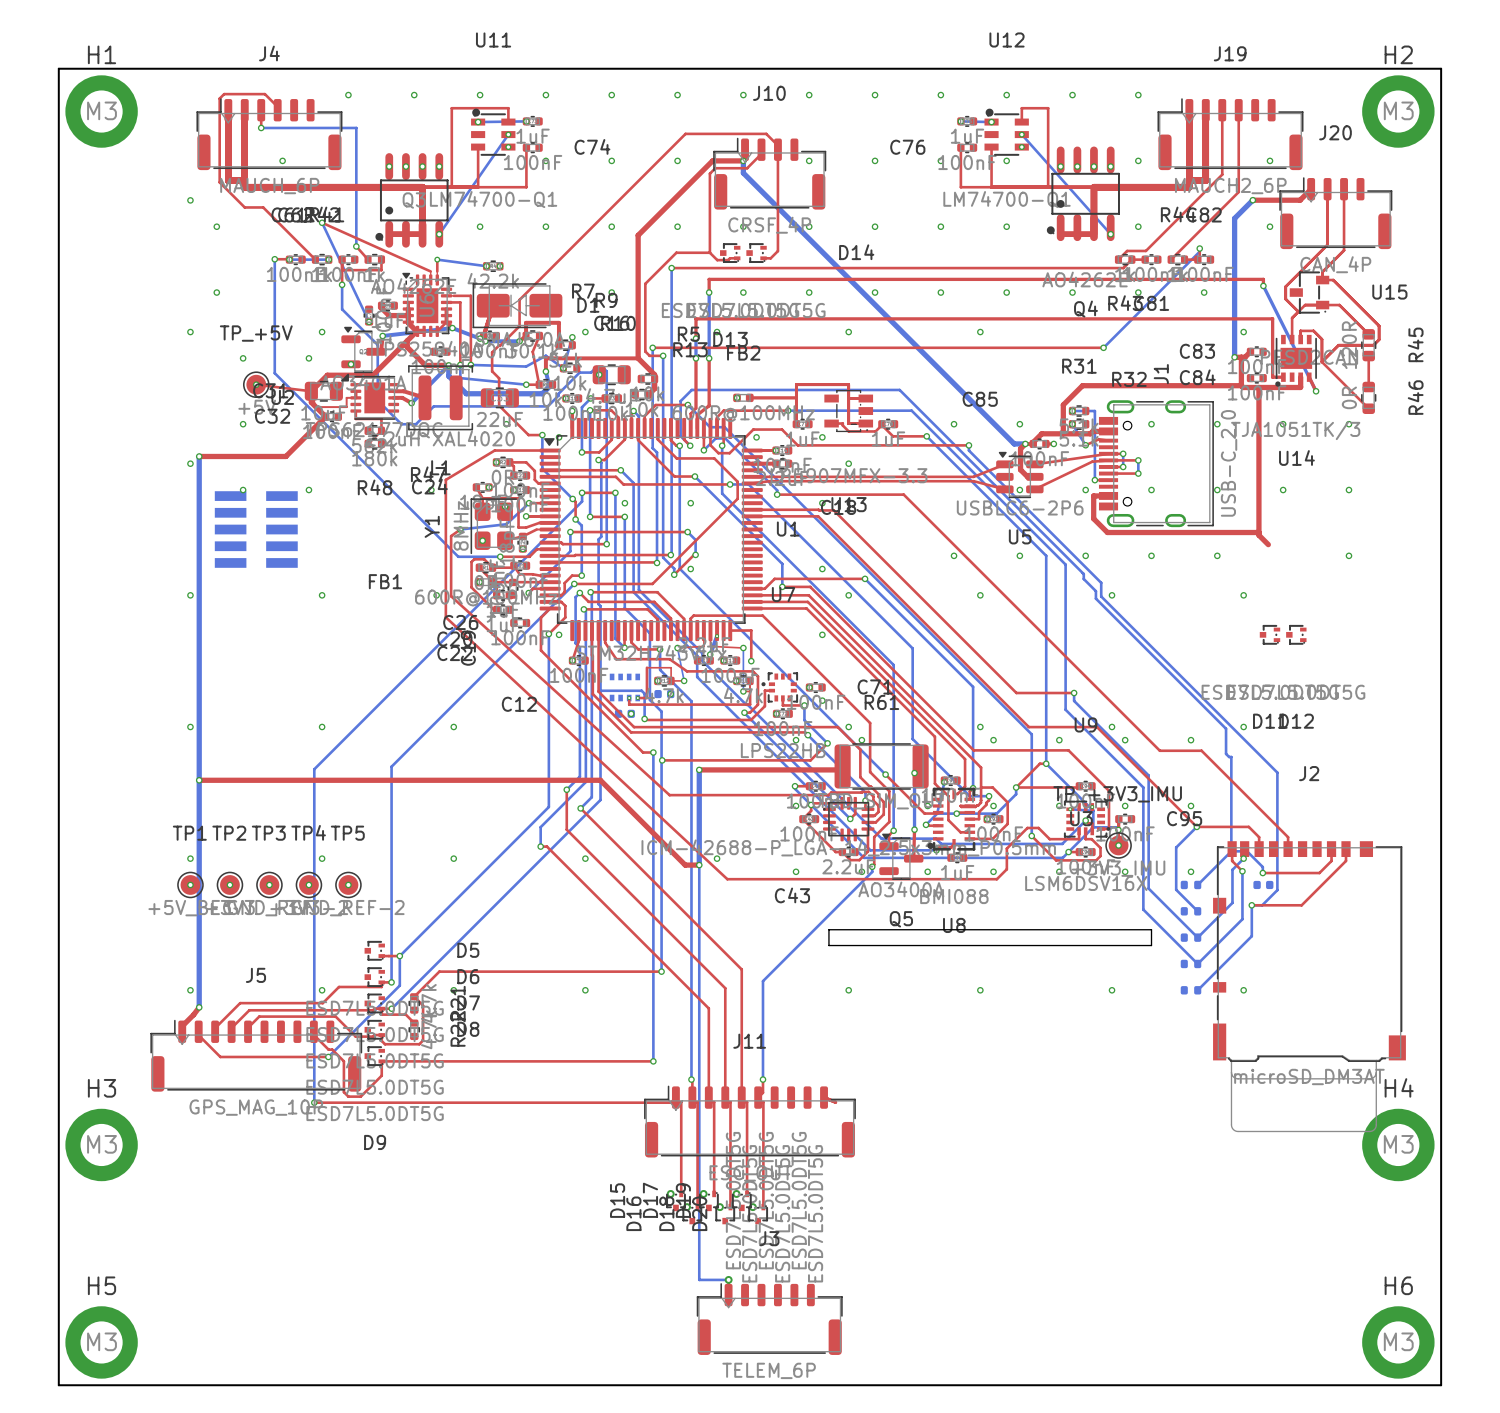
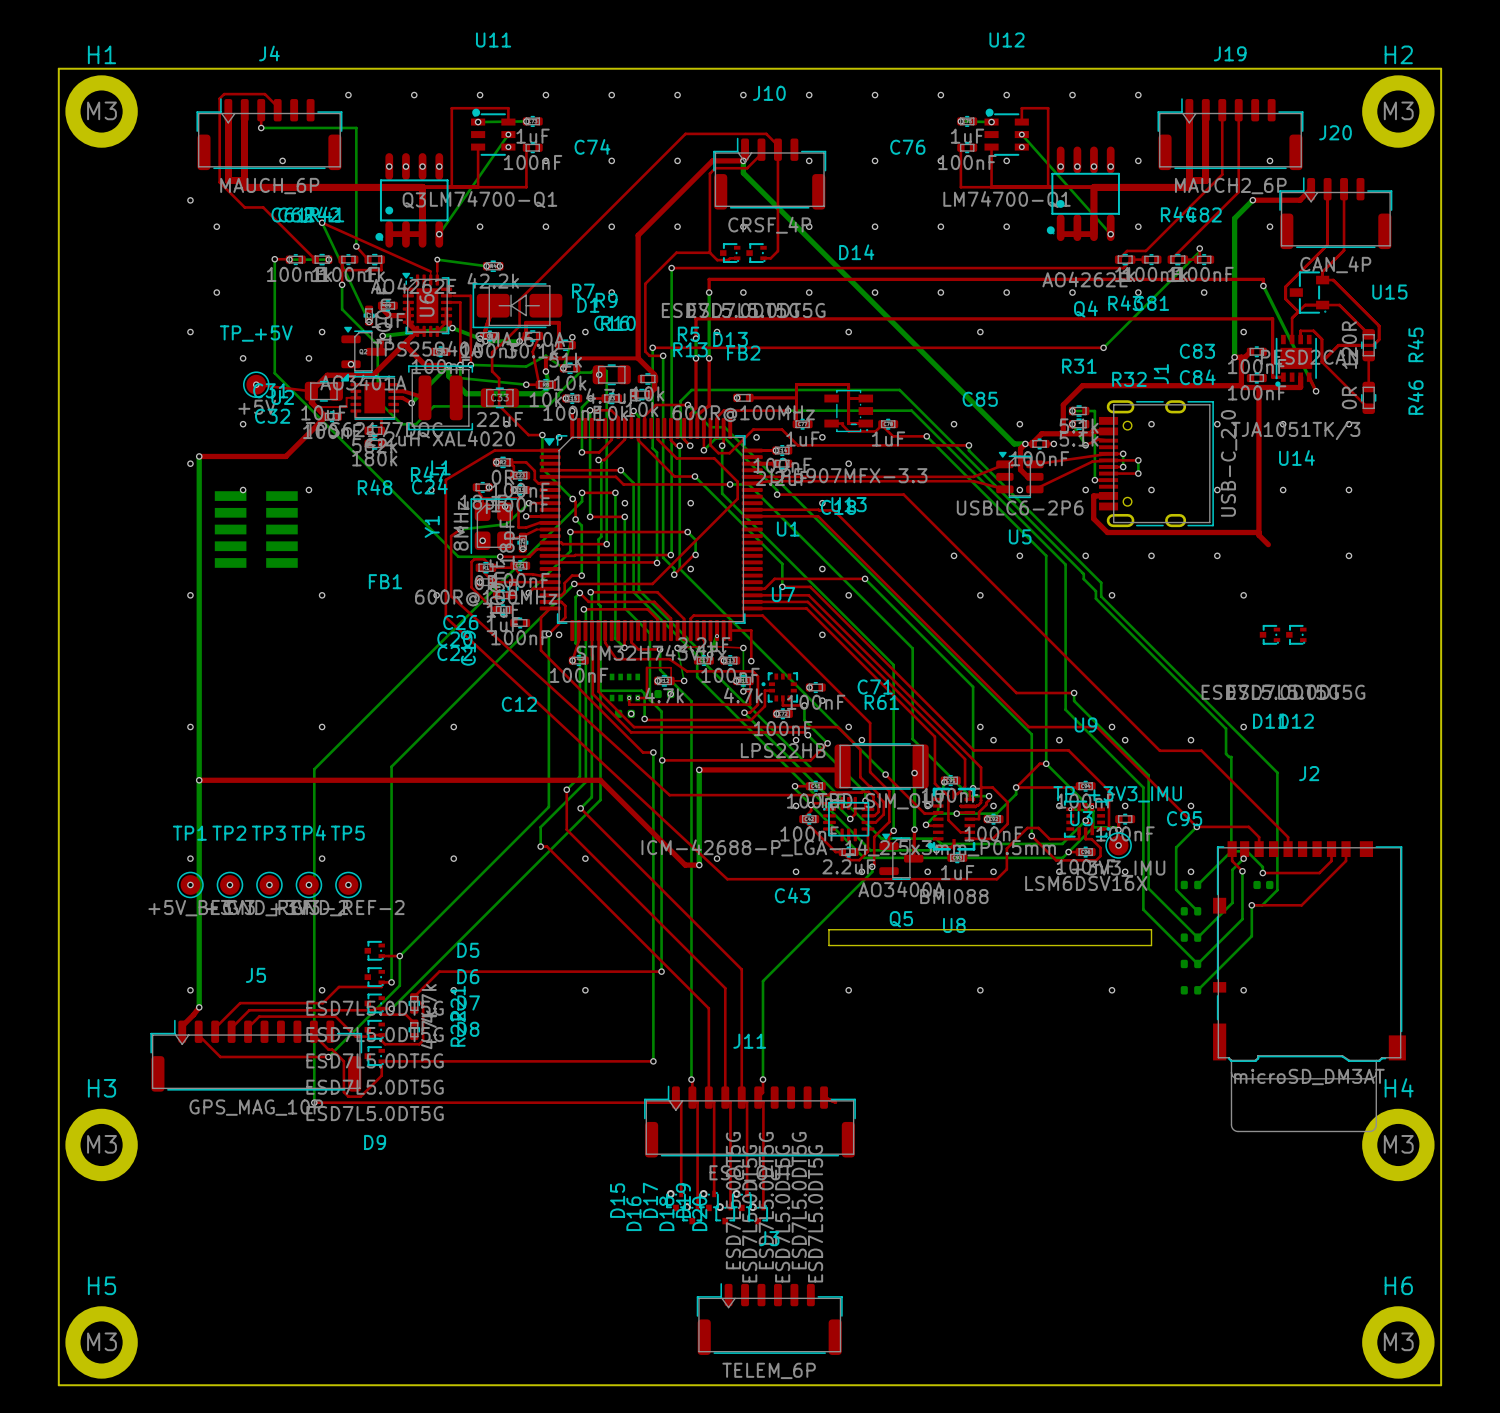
bottom track: (699, 865) (699, 1279) (728, 1279) -> none
via: (728, 1279) -> none

